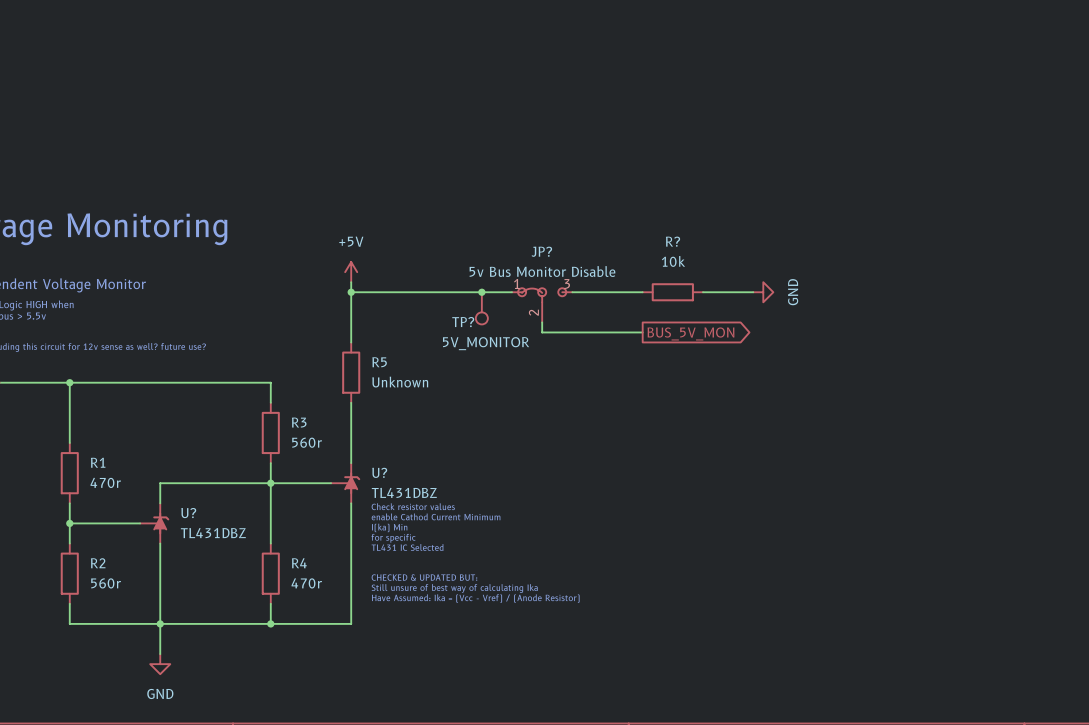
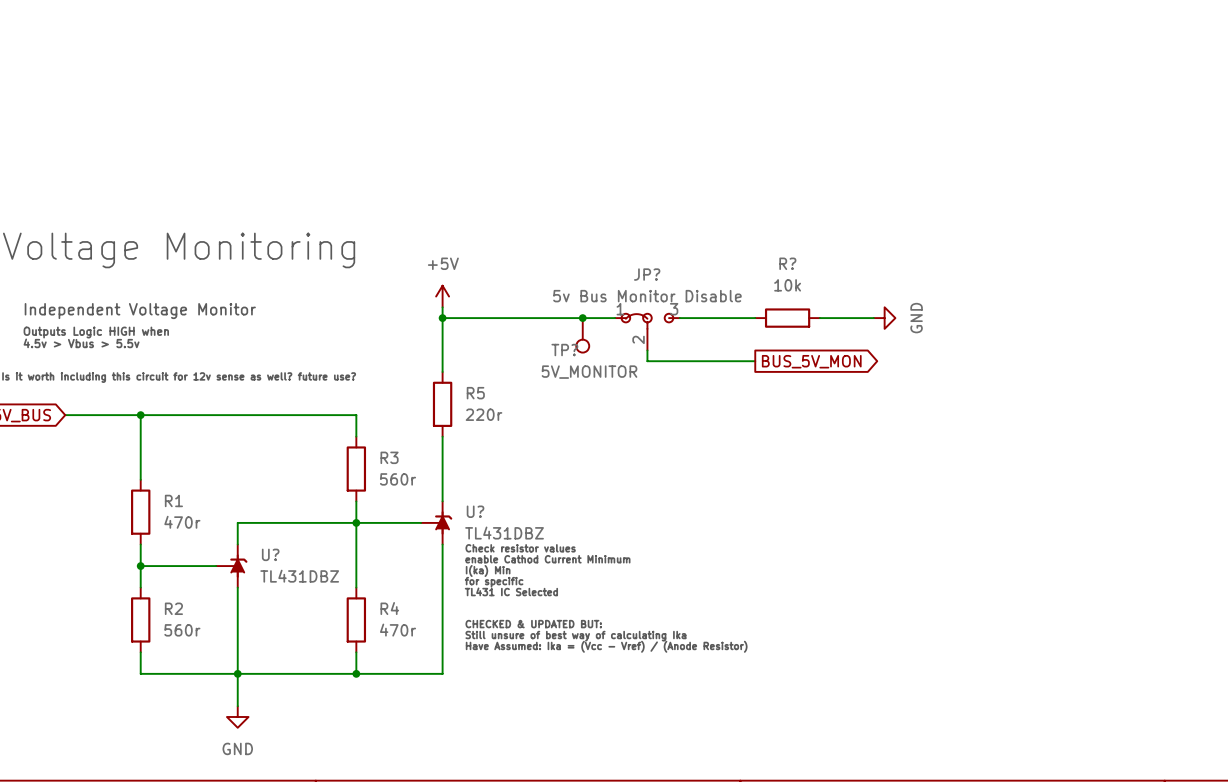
R5 value: Unknown (400, 382) -> 220r (484, 414)

